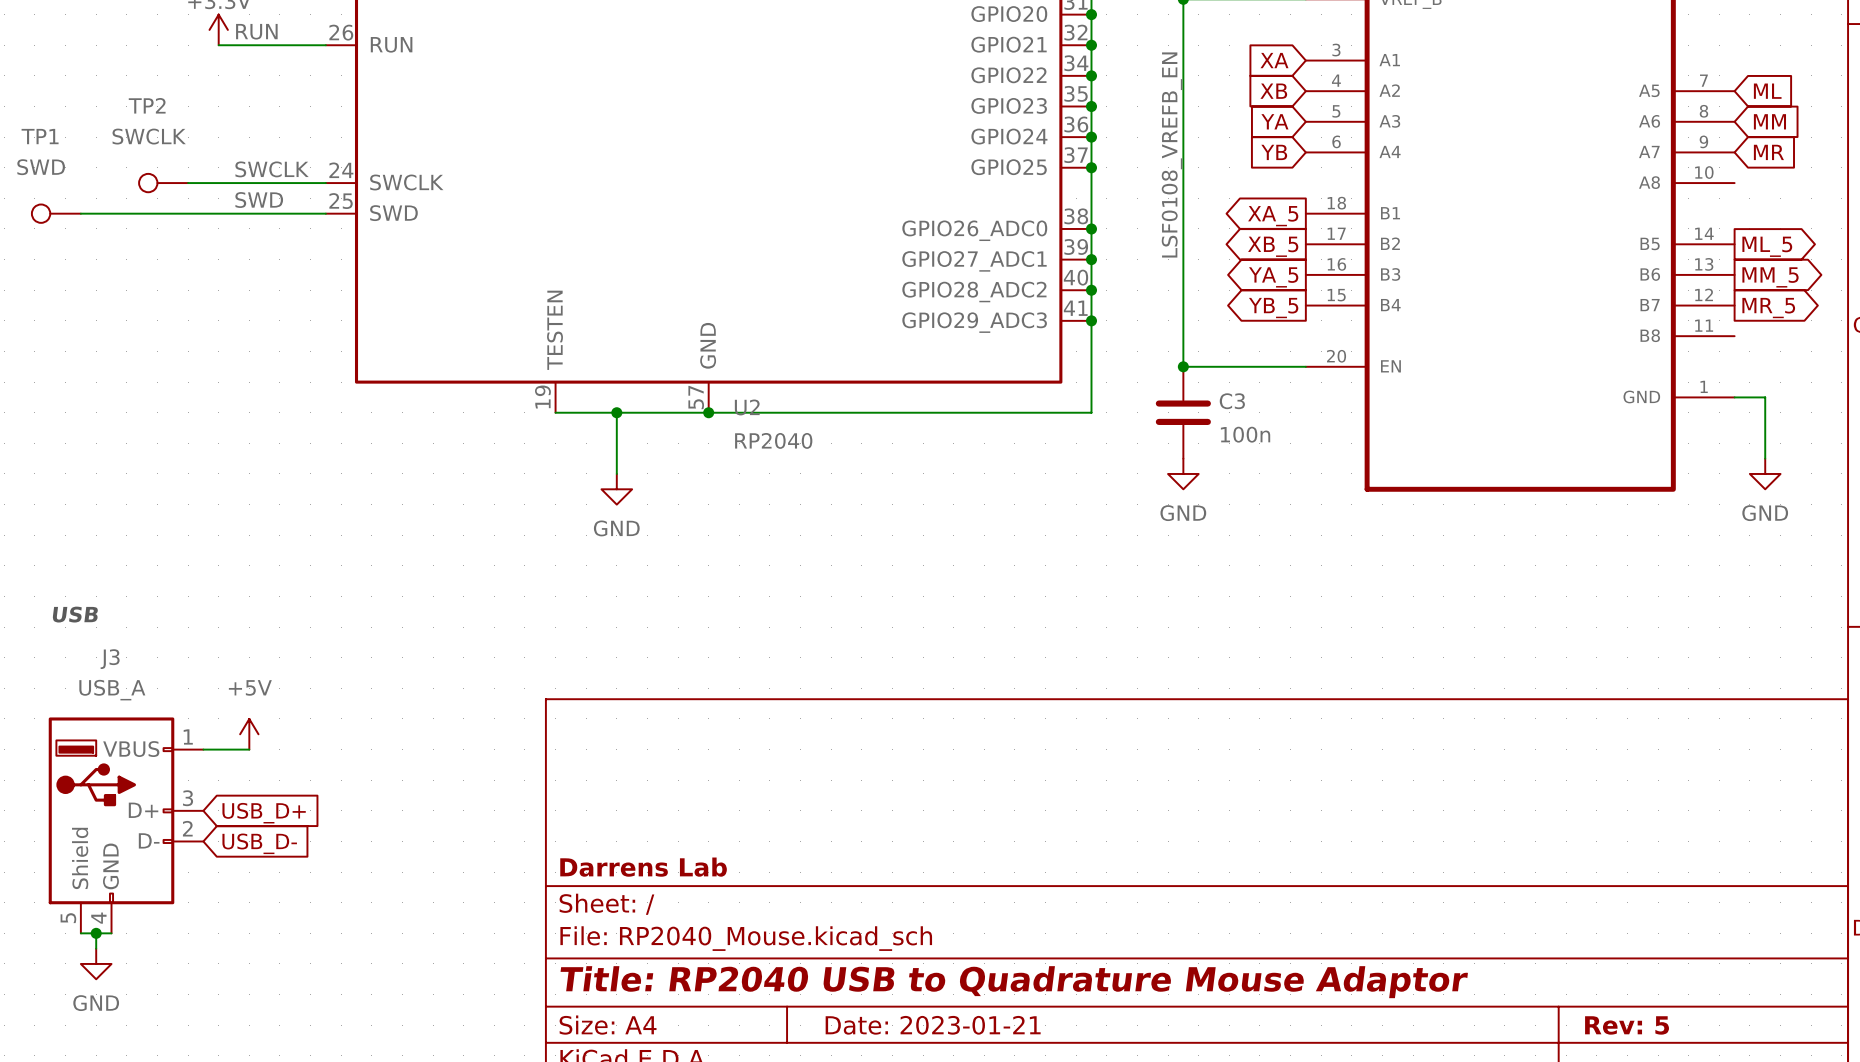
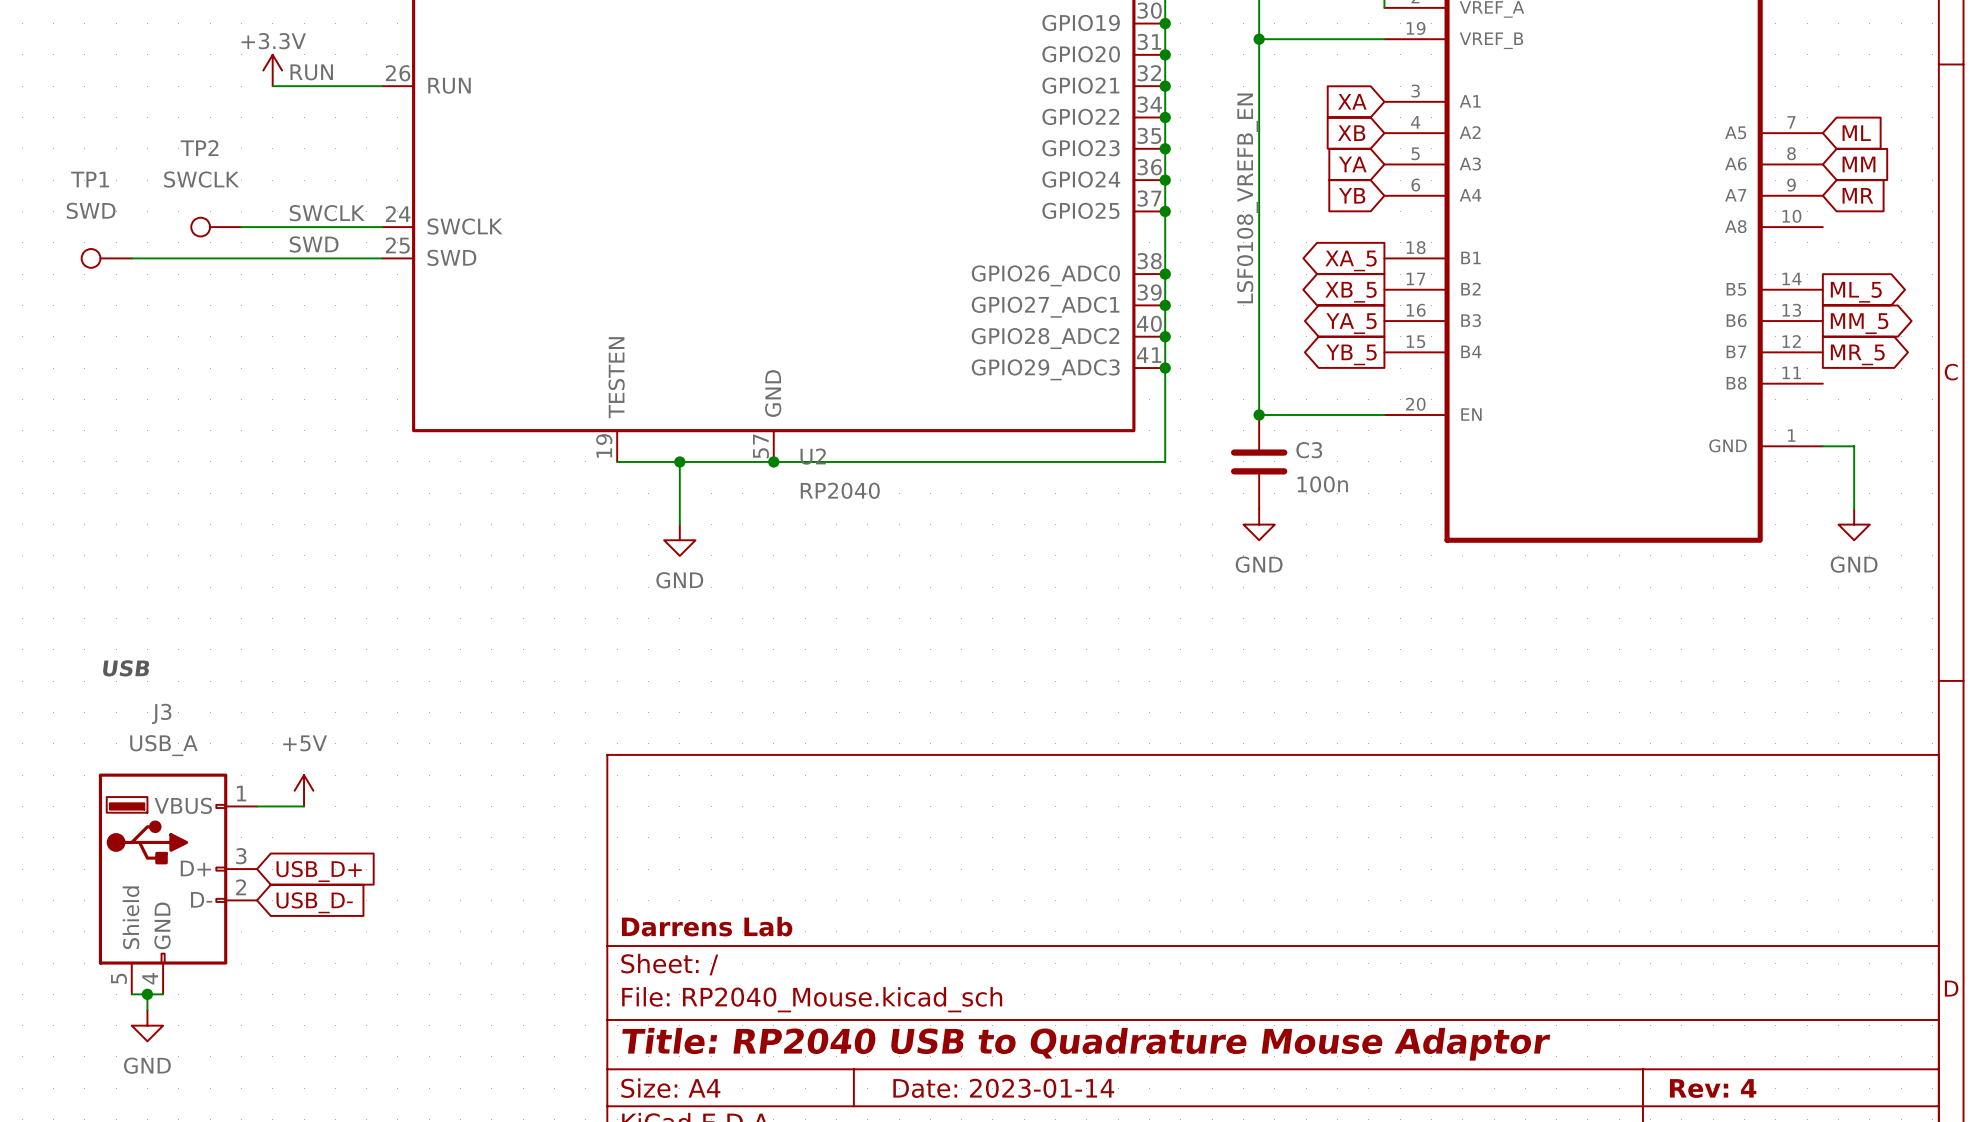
title block: Date: 2023-01-21 (933, 1025) -> Date: 2023-01-14 (1003, 1088)
title block: Rev: 5 (1627, 1025) -> Rev: 4 (1713, 1088)

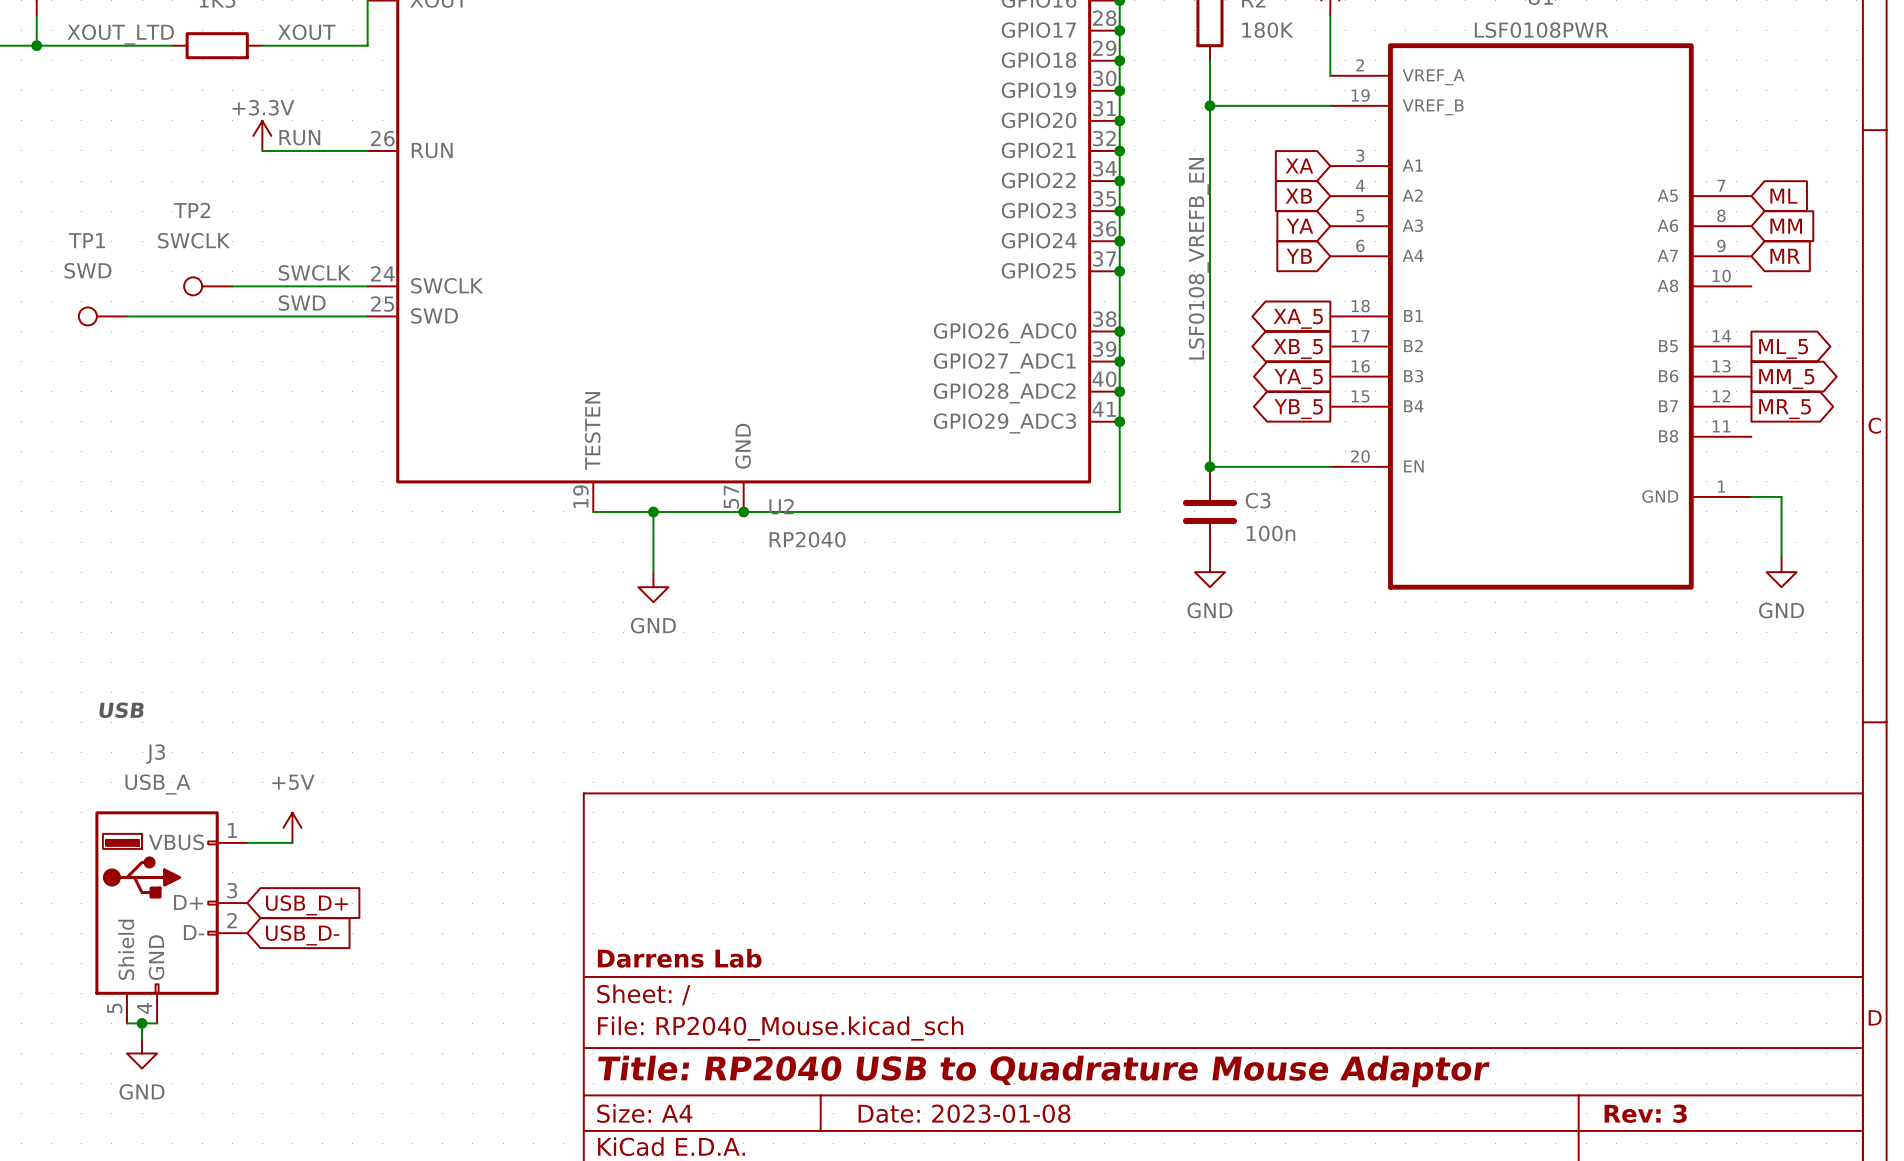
title block: Date: 2023-01-14 (1003, 1088) -> Date: 2023-01-08 (964, 1113)
title block: Rev: 4 (1713, 1088) -> Rev: 3 (1645, 1113)

